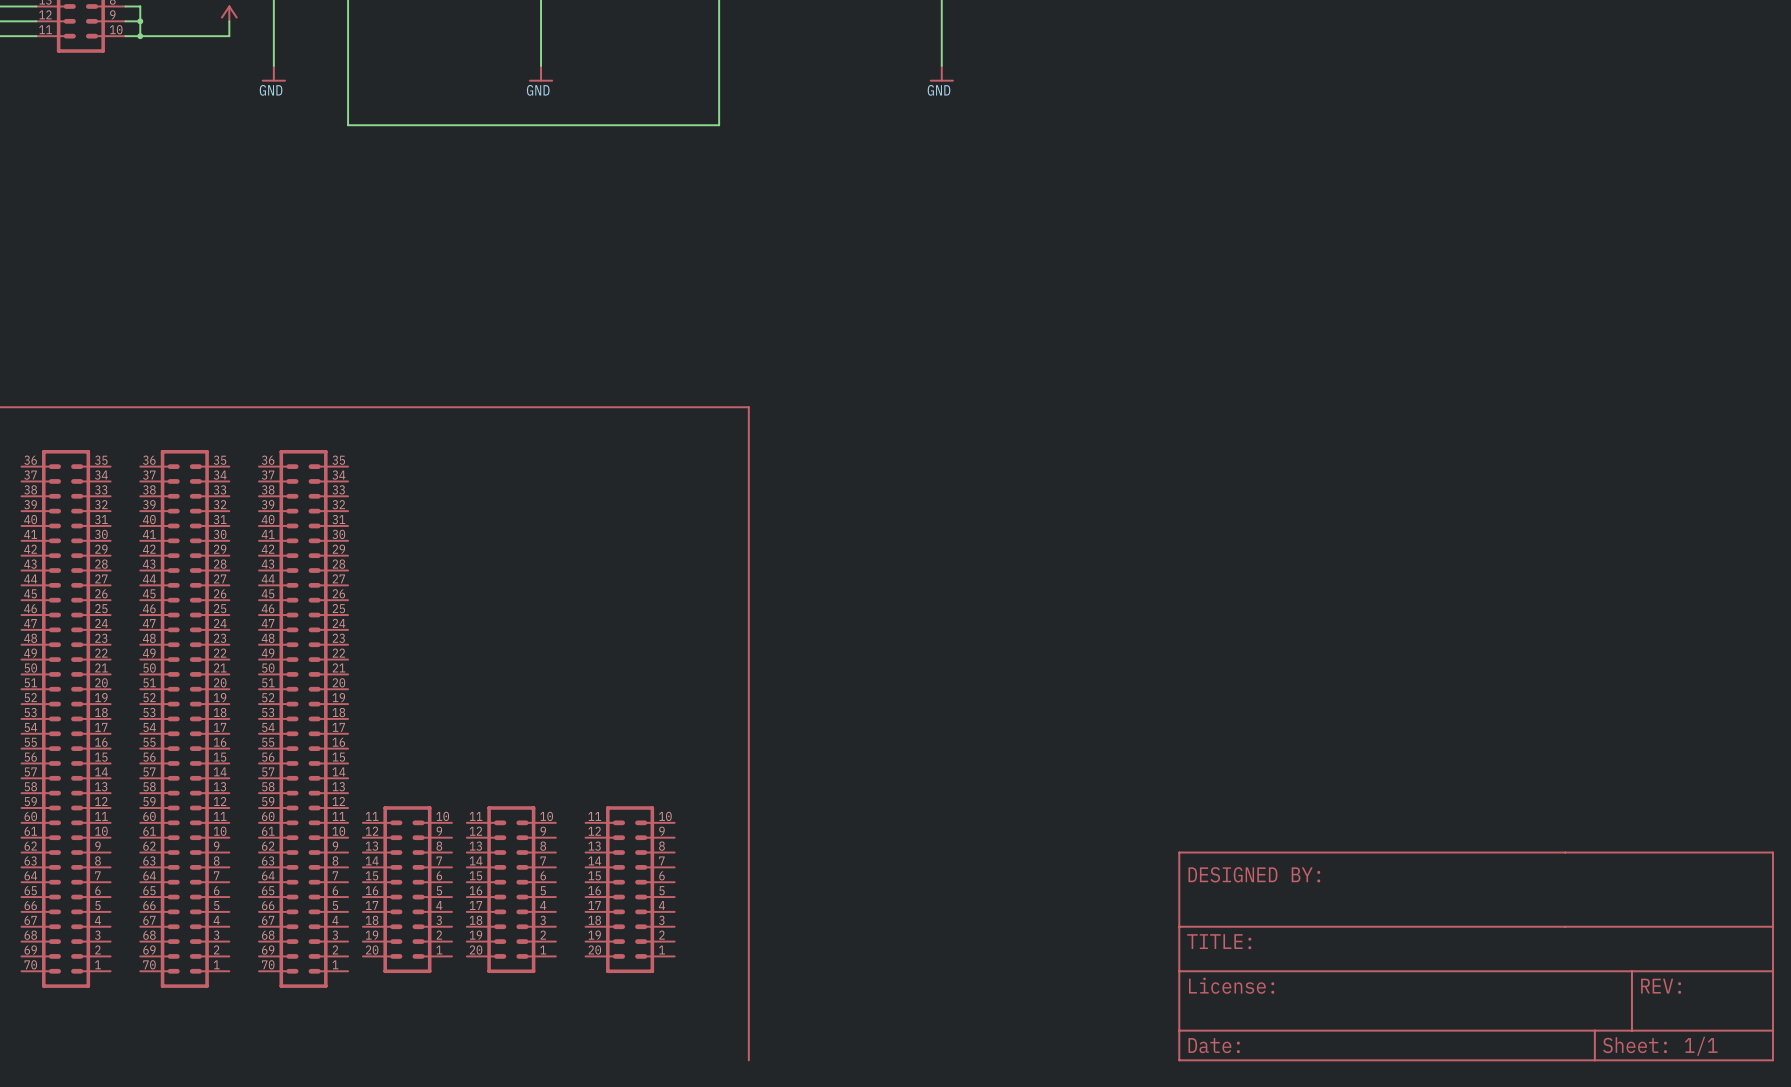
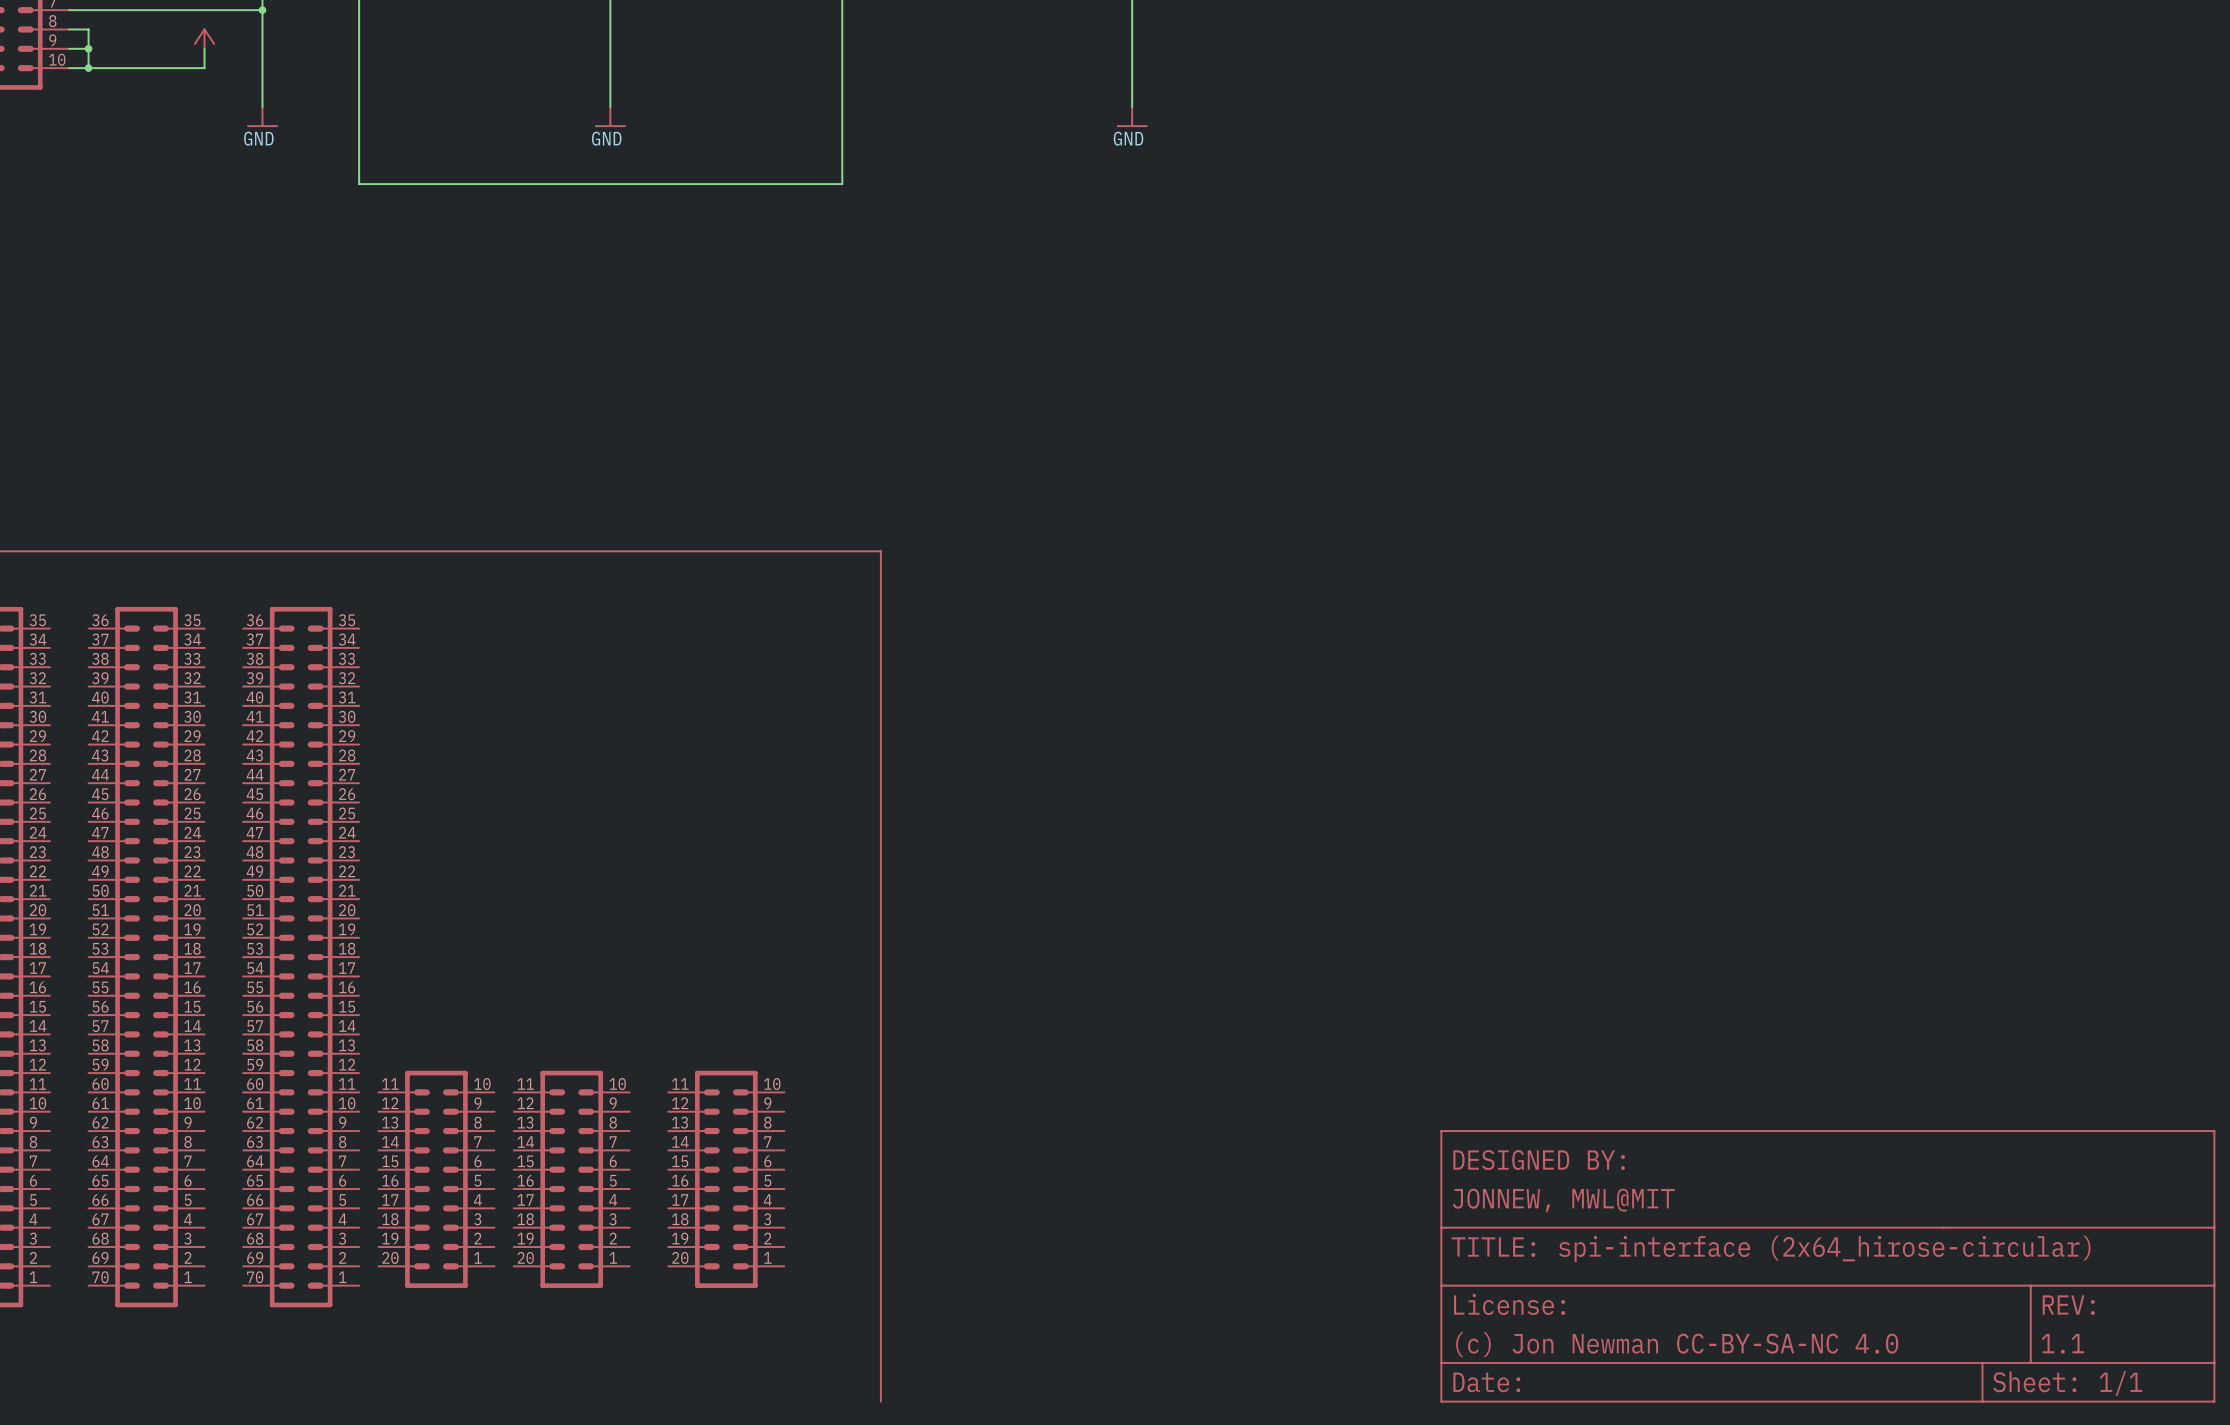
part text: none -> JONNEW, MWL@MIT (1563, 1200)
part text: none -> spi-interface (2x64_hirose-circular) (1824, 1248)
part text: none -> 1.1 (2062, 1343)
part text: none -> (c) Jon Newman CC-BY-SA-NC 4.0 (1677, 1344)

